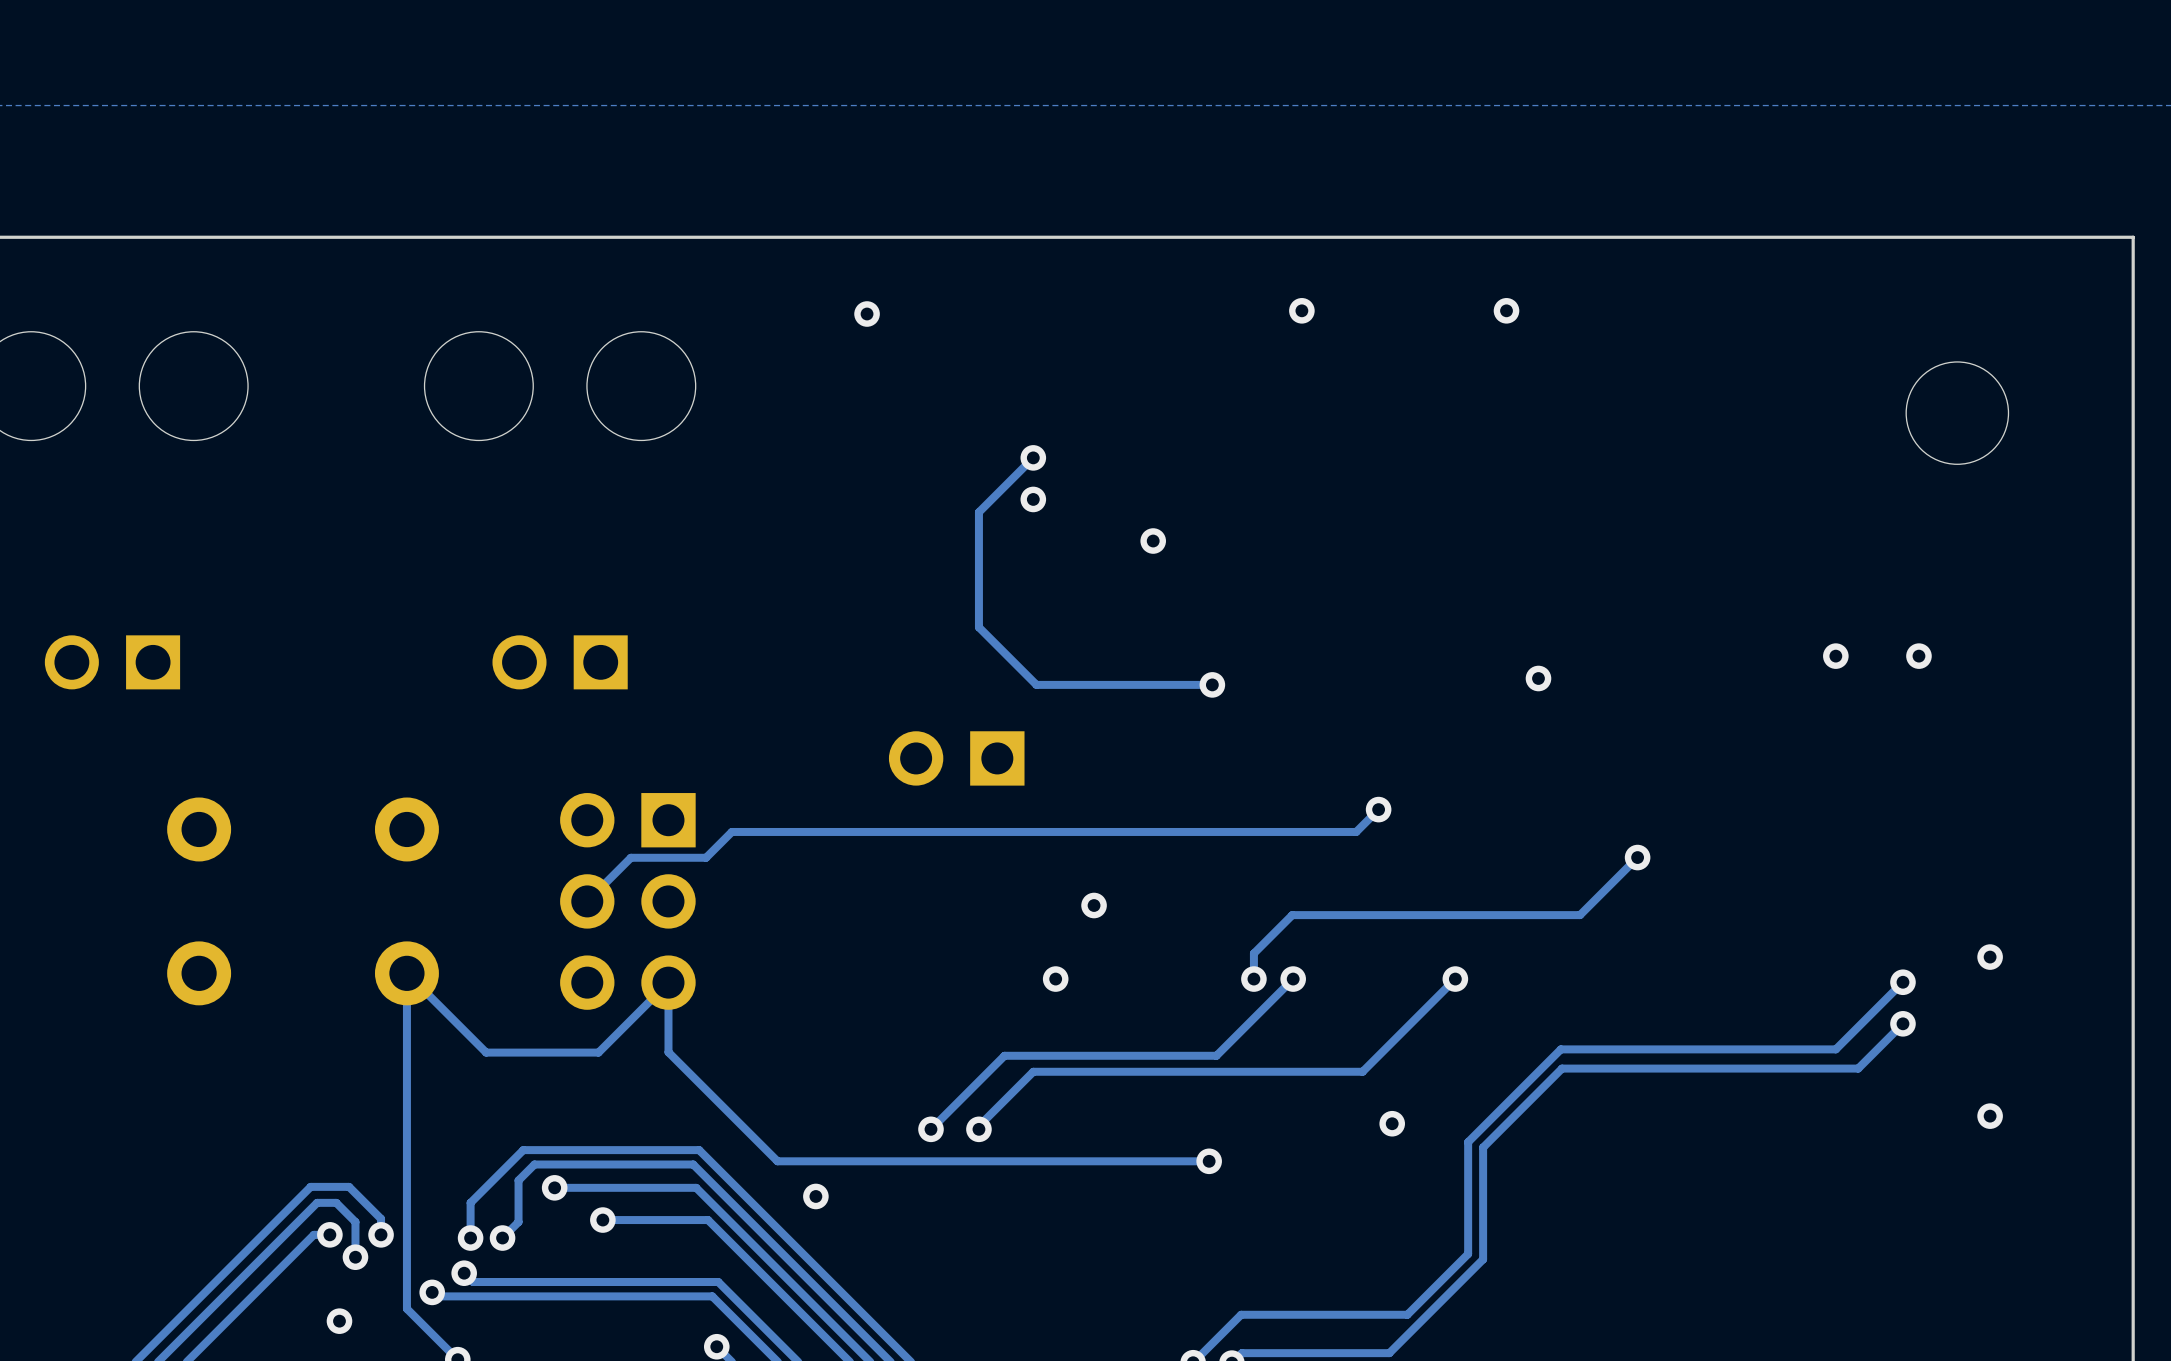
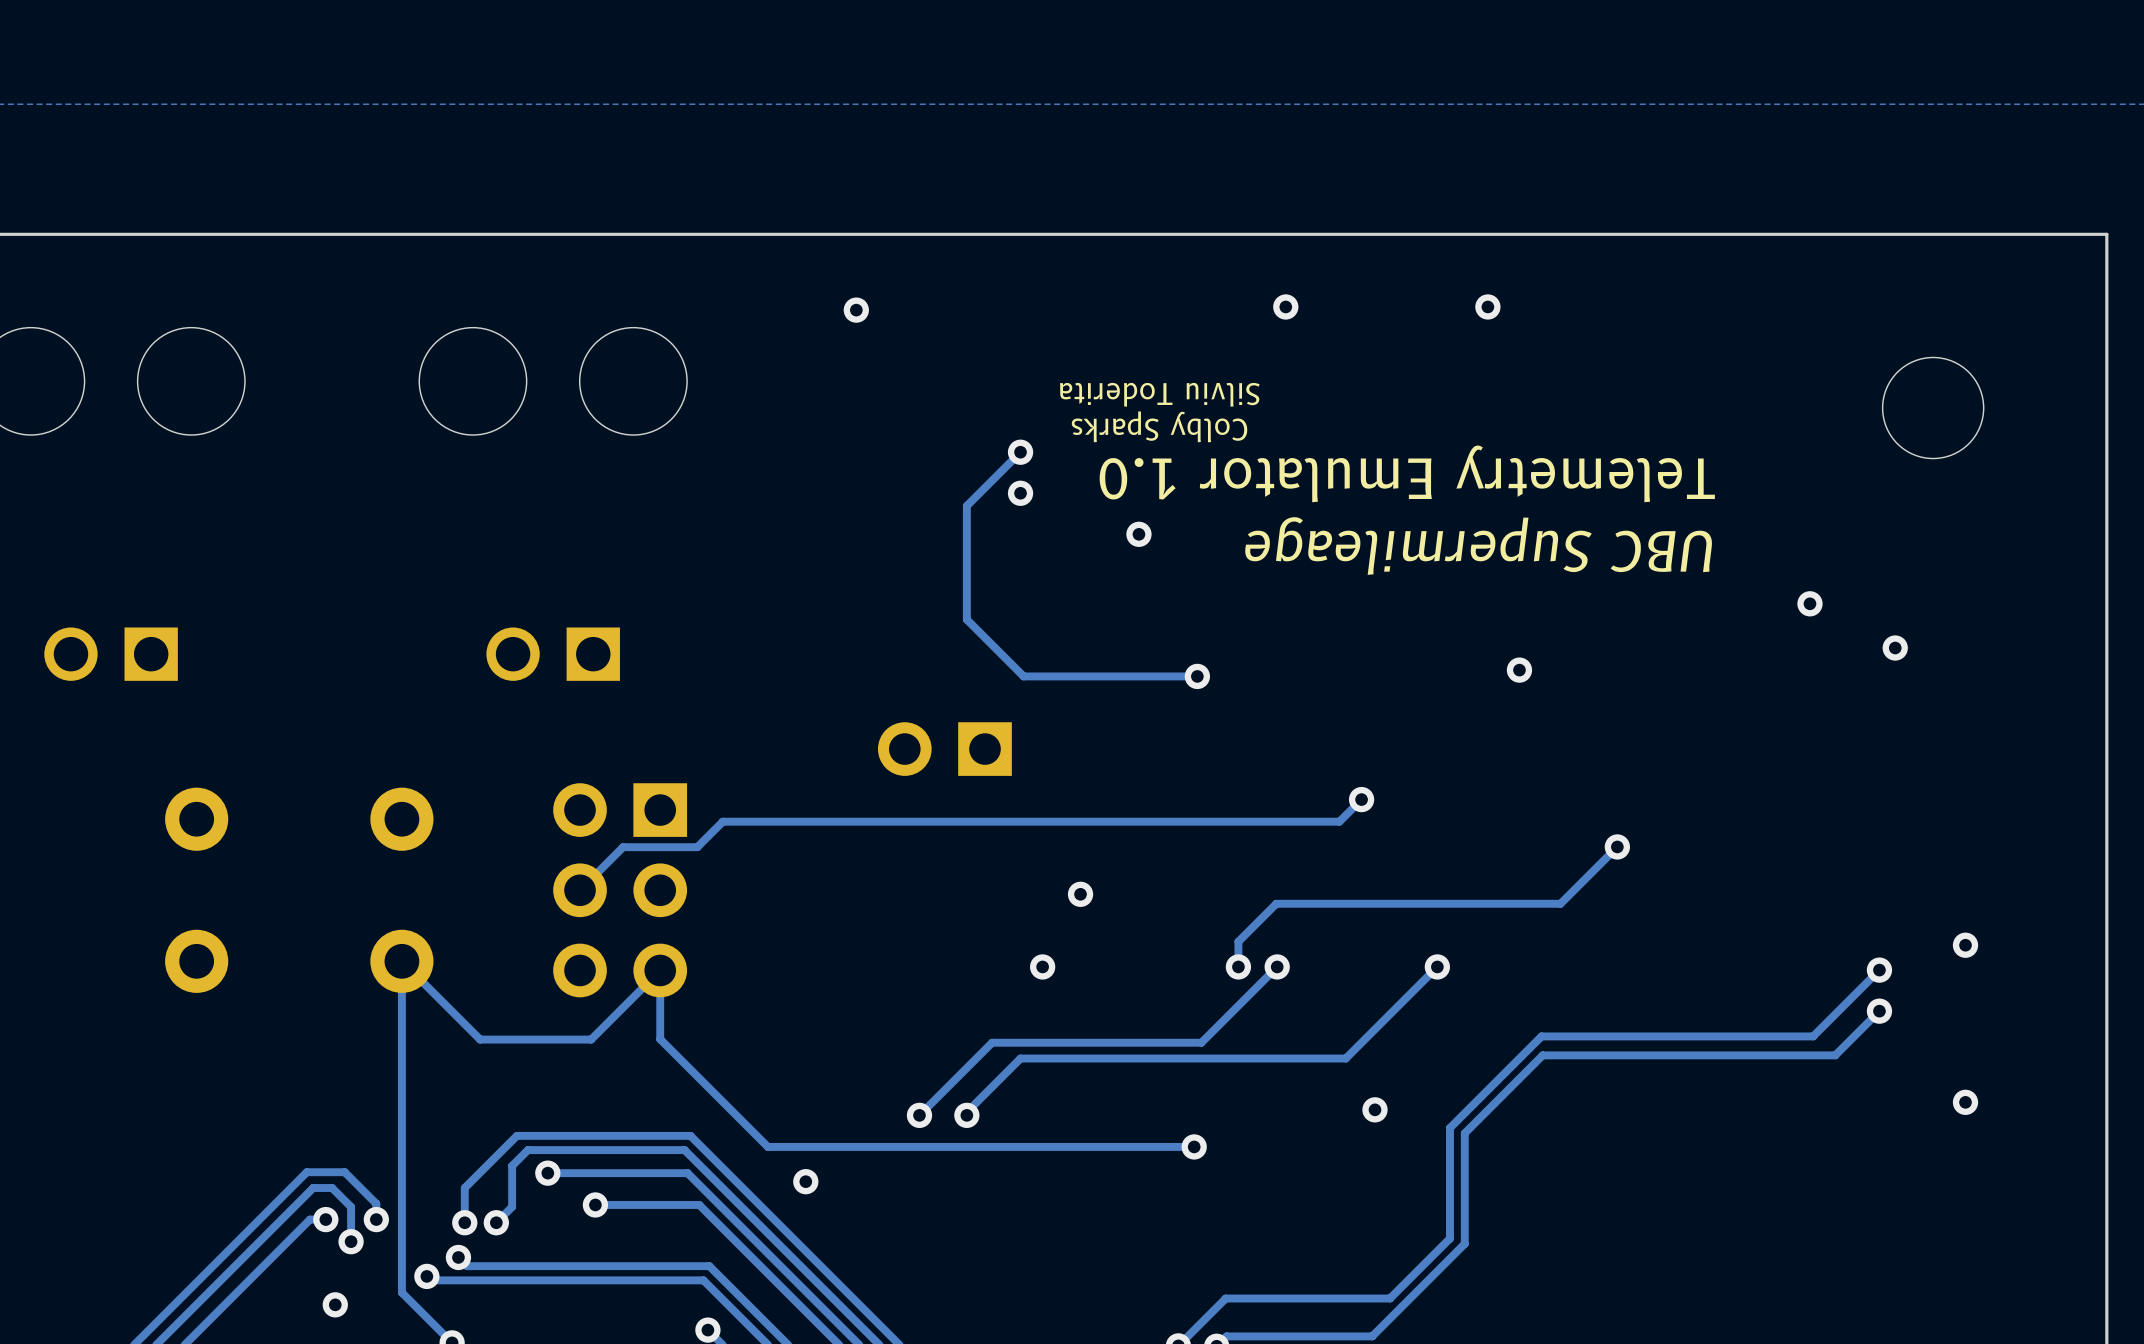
text: none -> Silviu Toderita (1159, 394)
text: none -> Colby Sparks (1159, 426)
text: none -> Telemetry Emulator 1.0 (1407, 473)
text: none -> UBC Supermileage (1478, 546)
via position: (1835, 656) -> (1809, 603)

